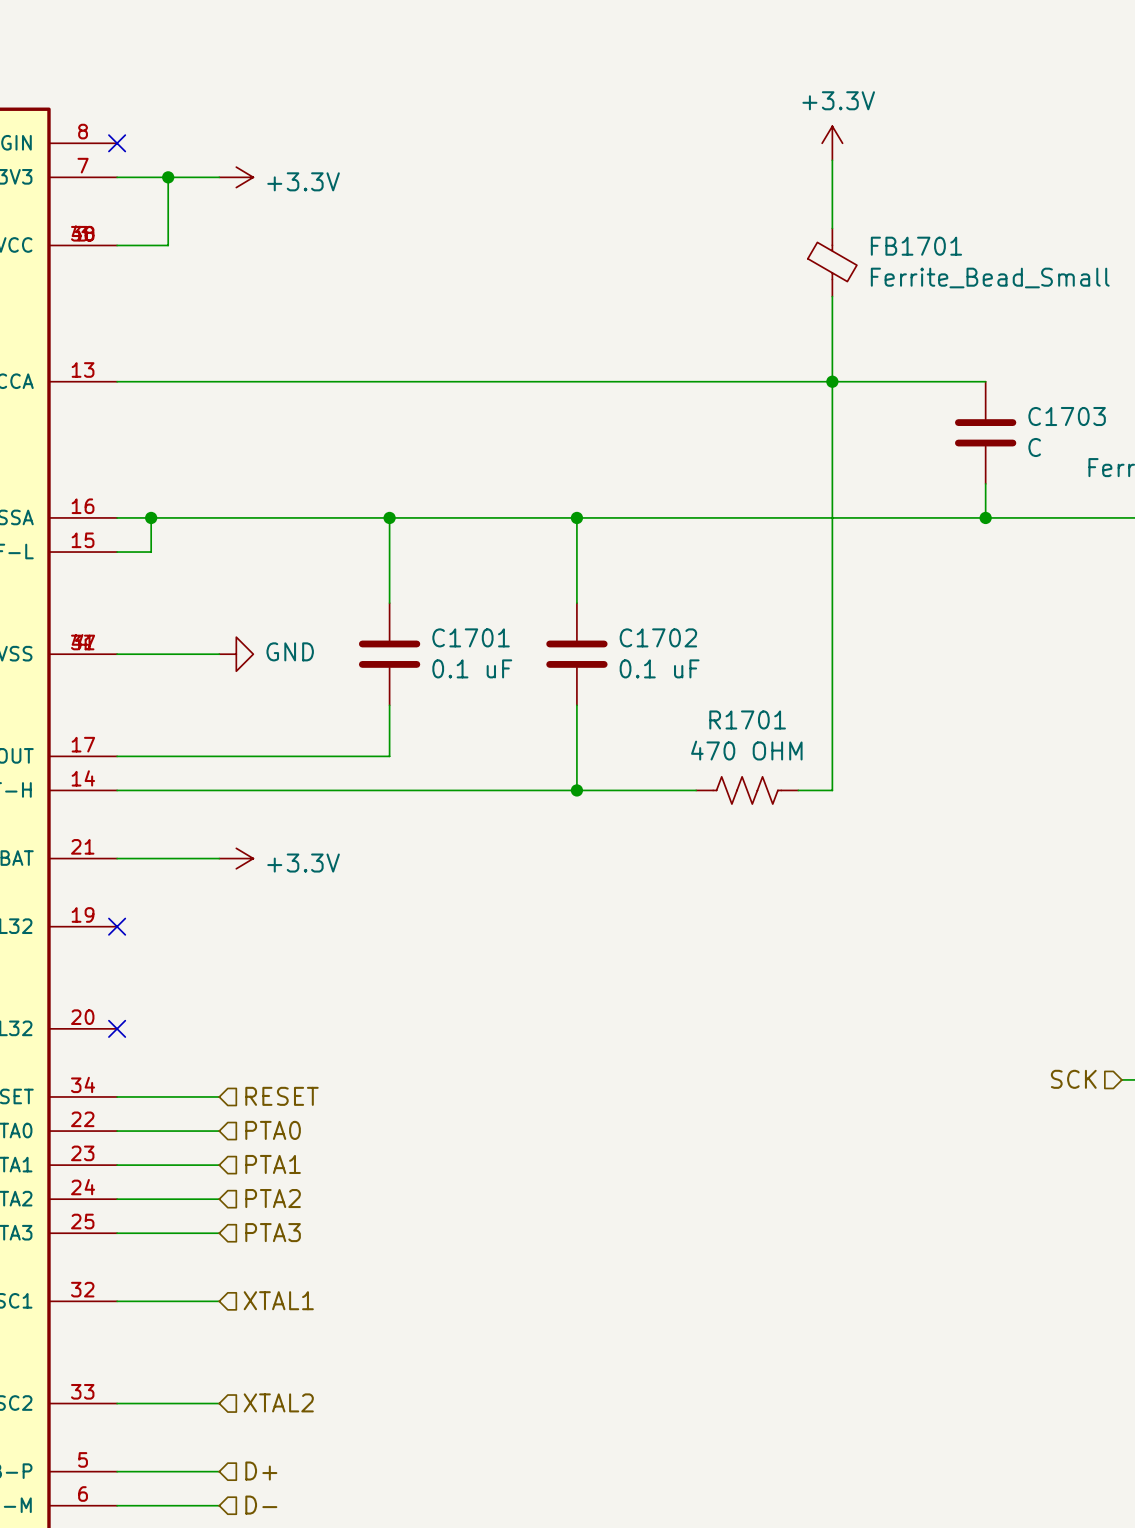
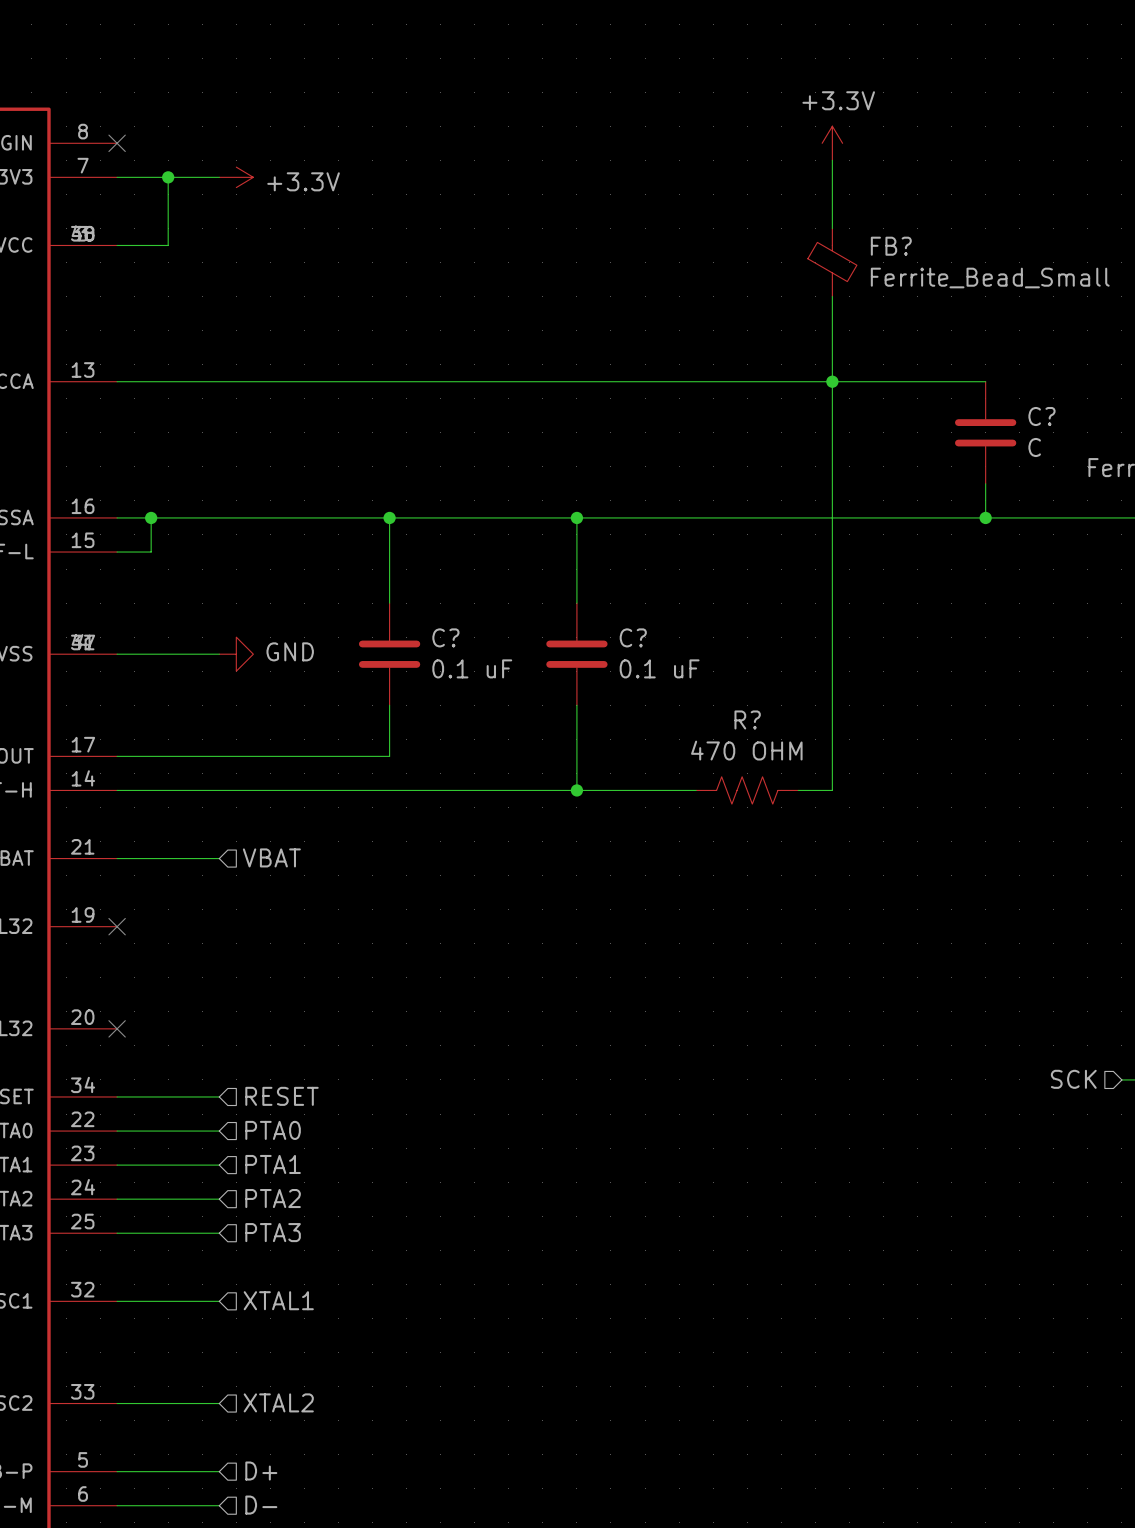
FB1701 name: FB1701 (916, 246) -> FB? (891, 246)
C1703 name: C1703 (1067, 416) -> C? (1041, 416)
C1701 name: C1701 (471, 637) -> C? (445, 637)
C1702 name: C1702 (658, 637) -> C? (633, 637)
R1701 name: R1701 (747, 719) -> R? (747, 719)
hierarchical label: none -> VBAT (271, 857)
power symbol: +3.3V (236, 858) -> none

